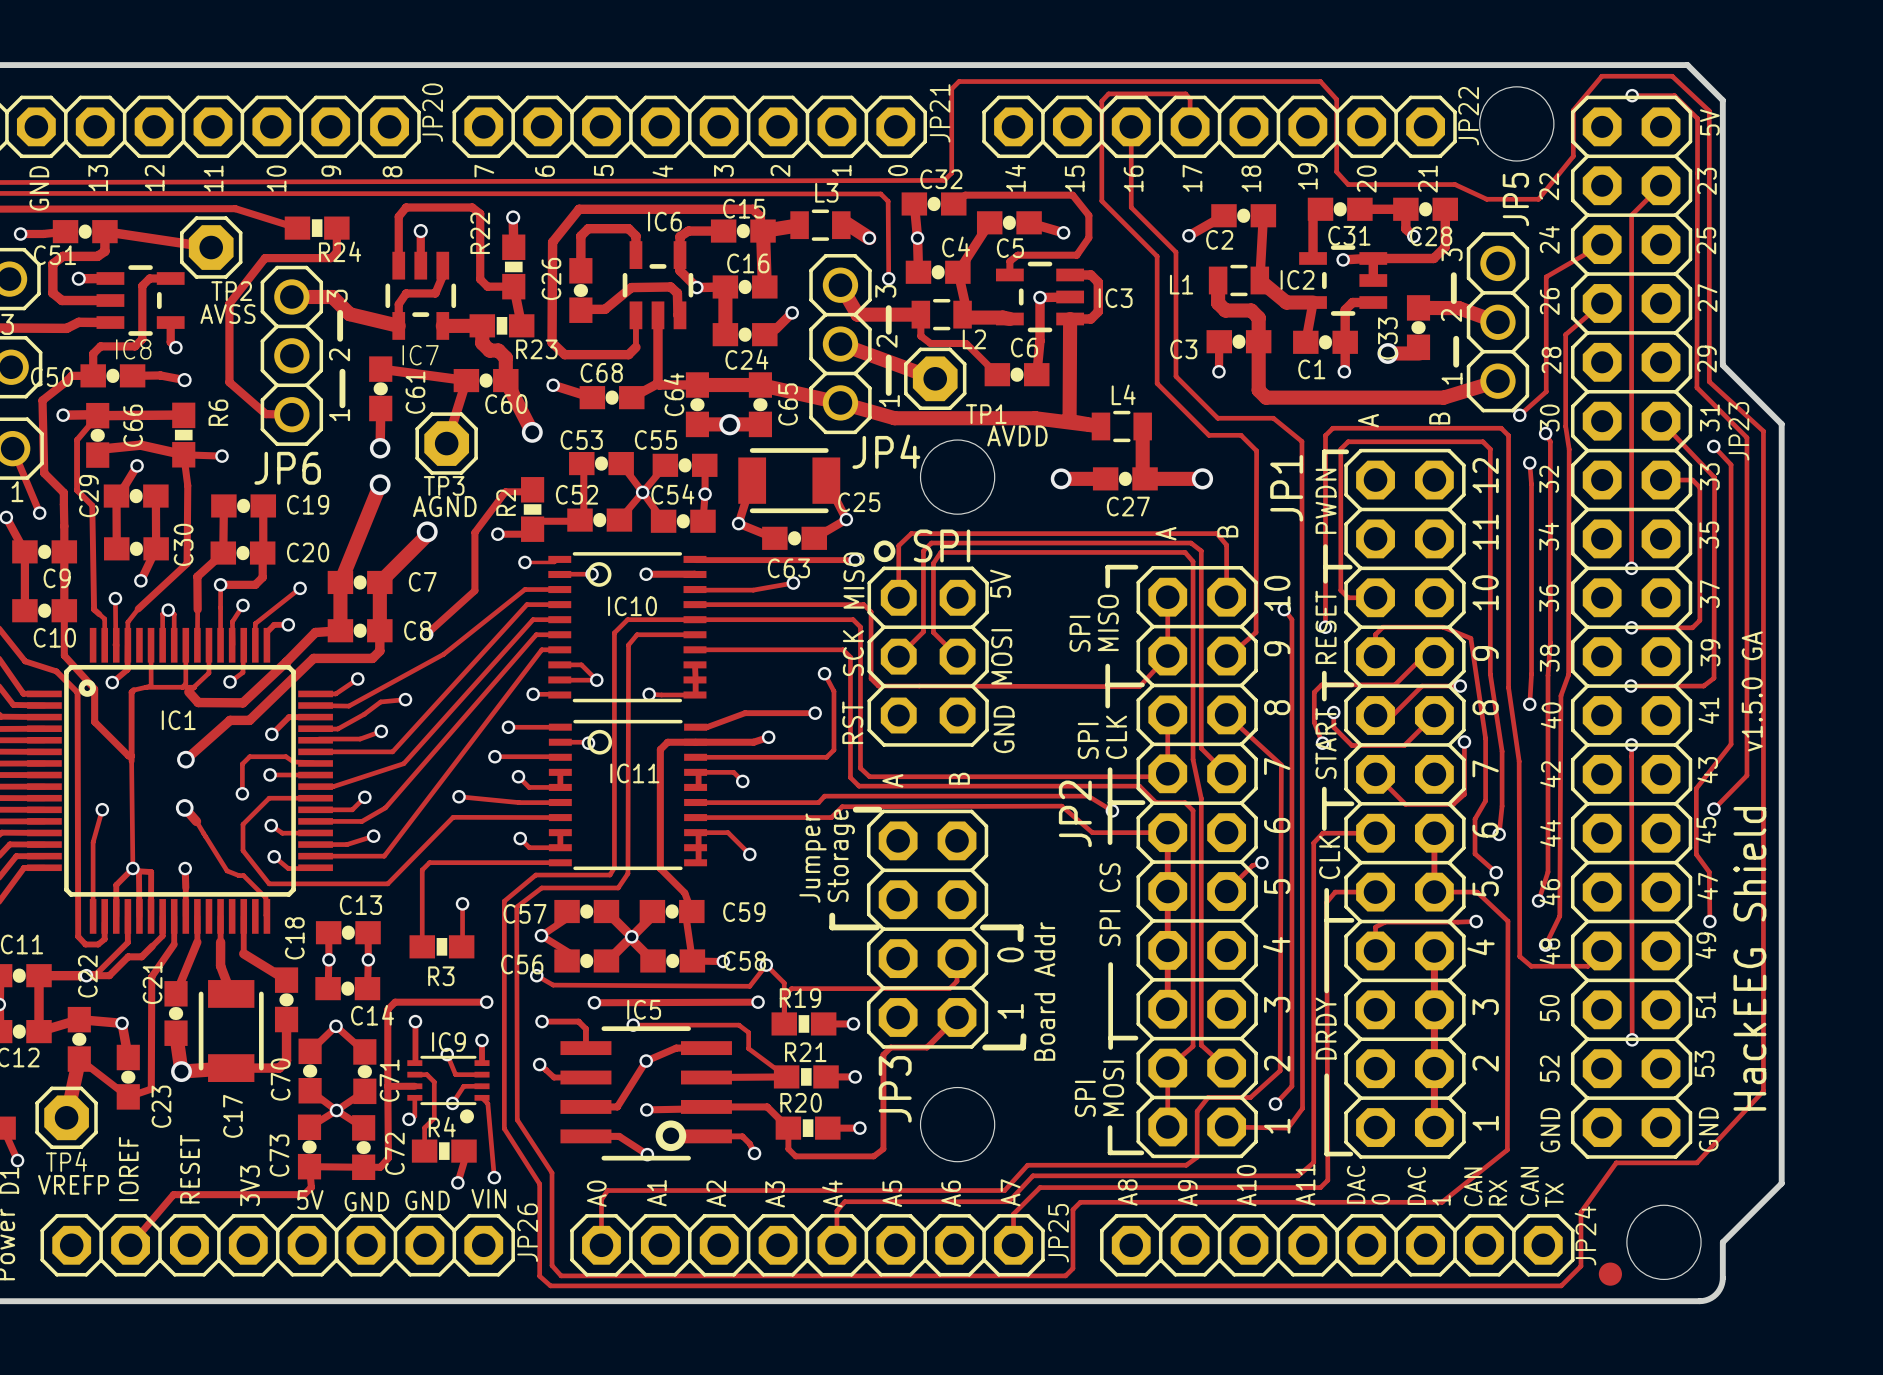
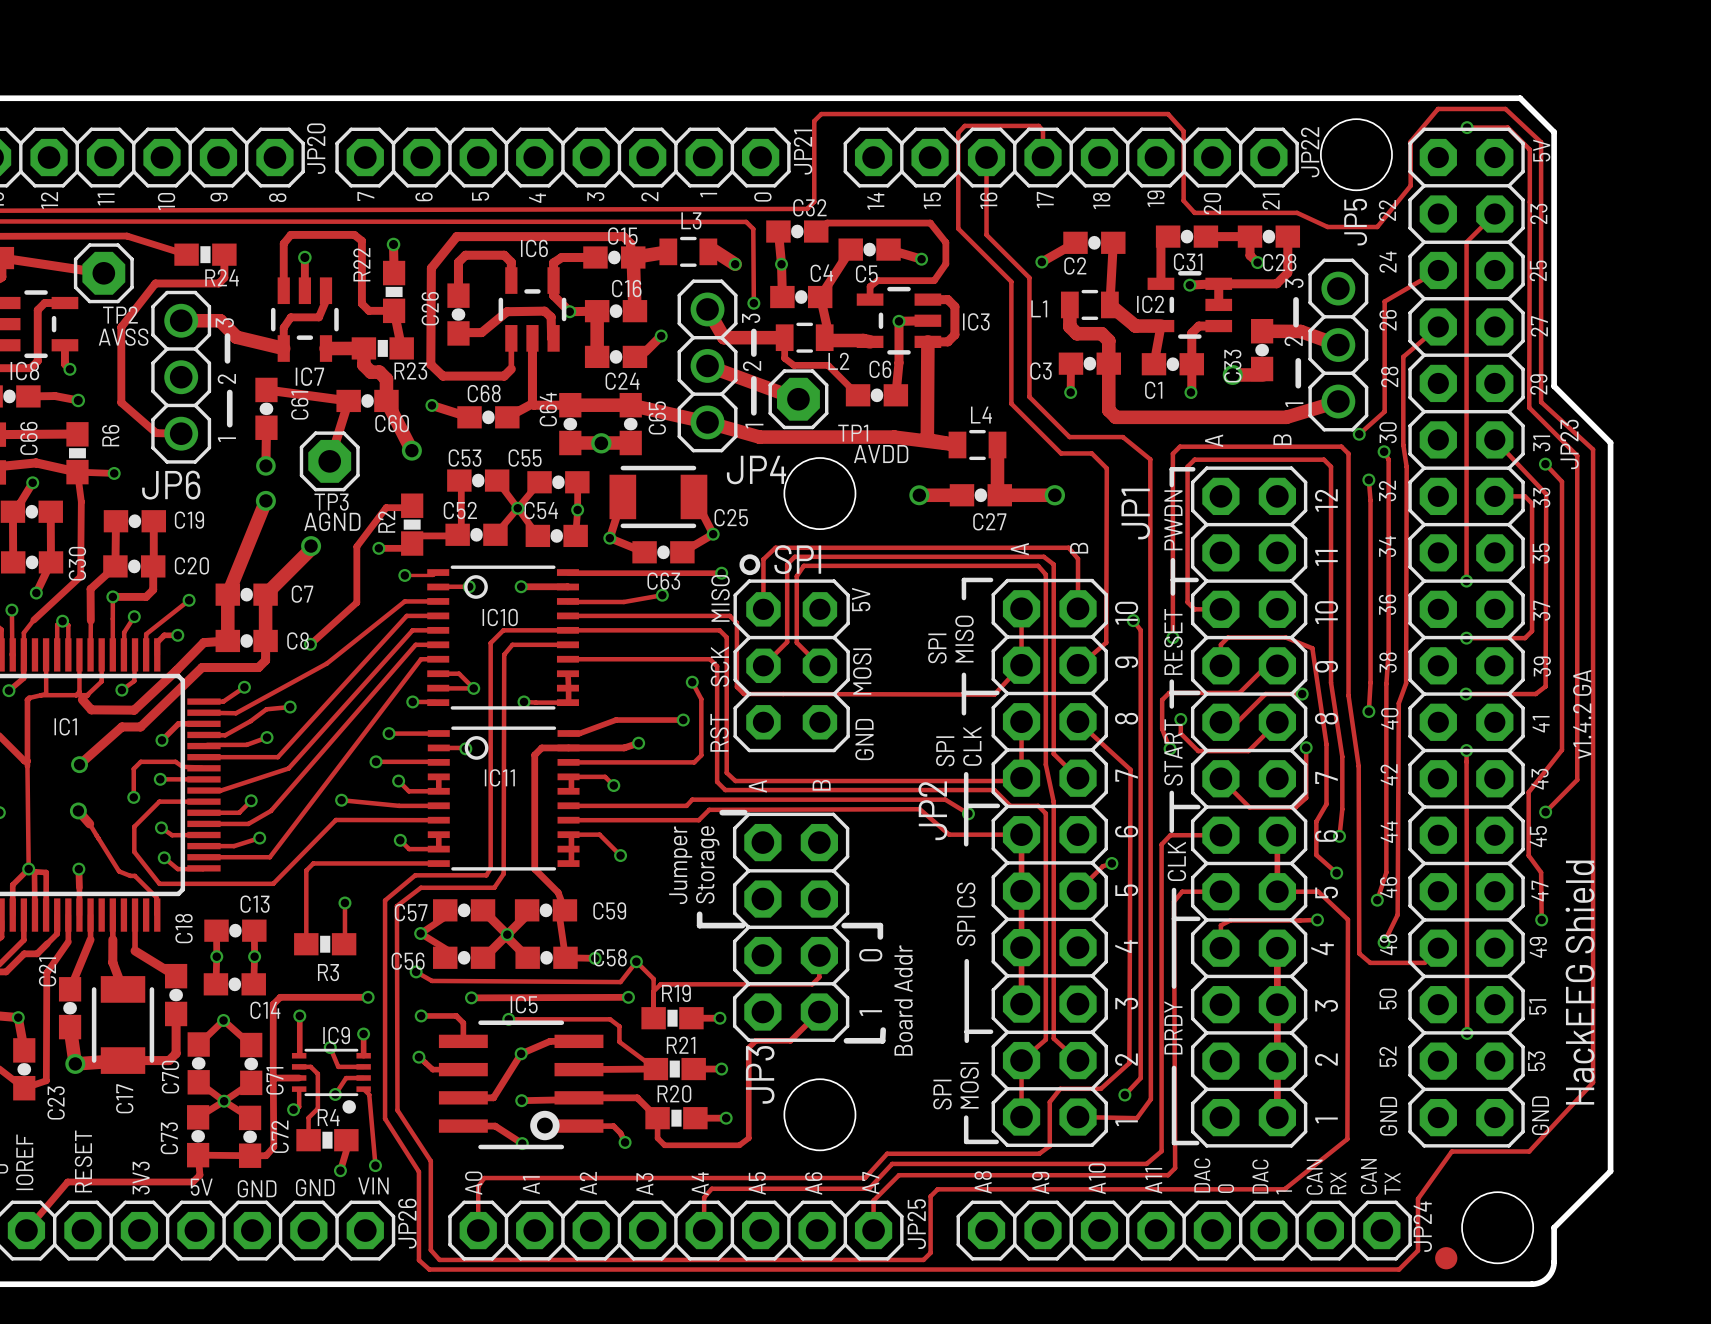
text: v1.5.0 GA (1752, 691) -> v1.4.2 GA (1582, 714)

